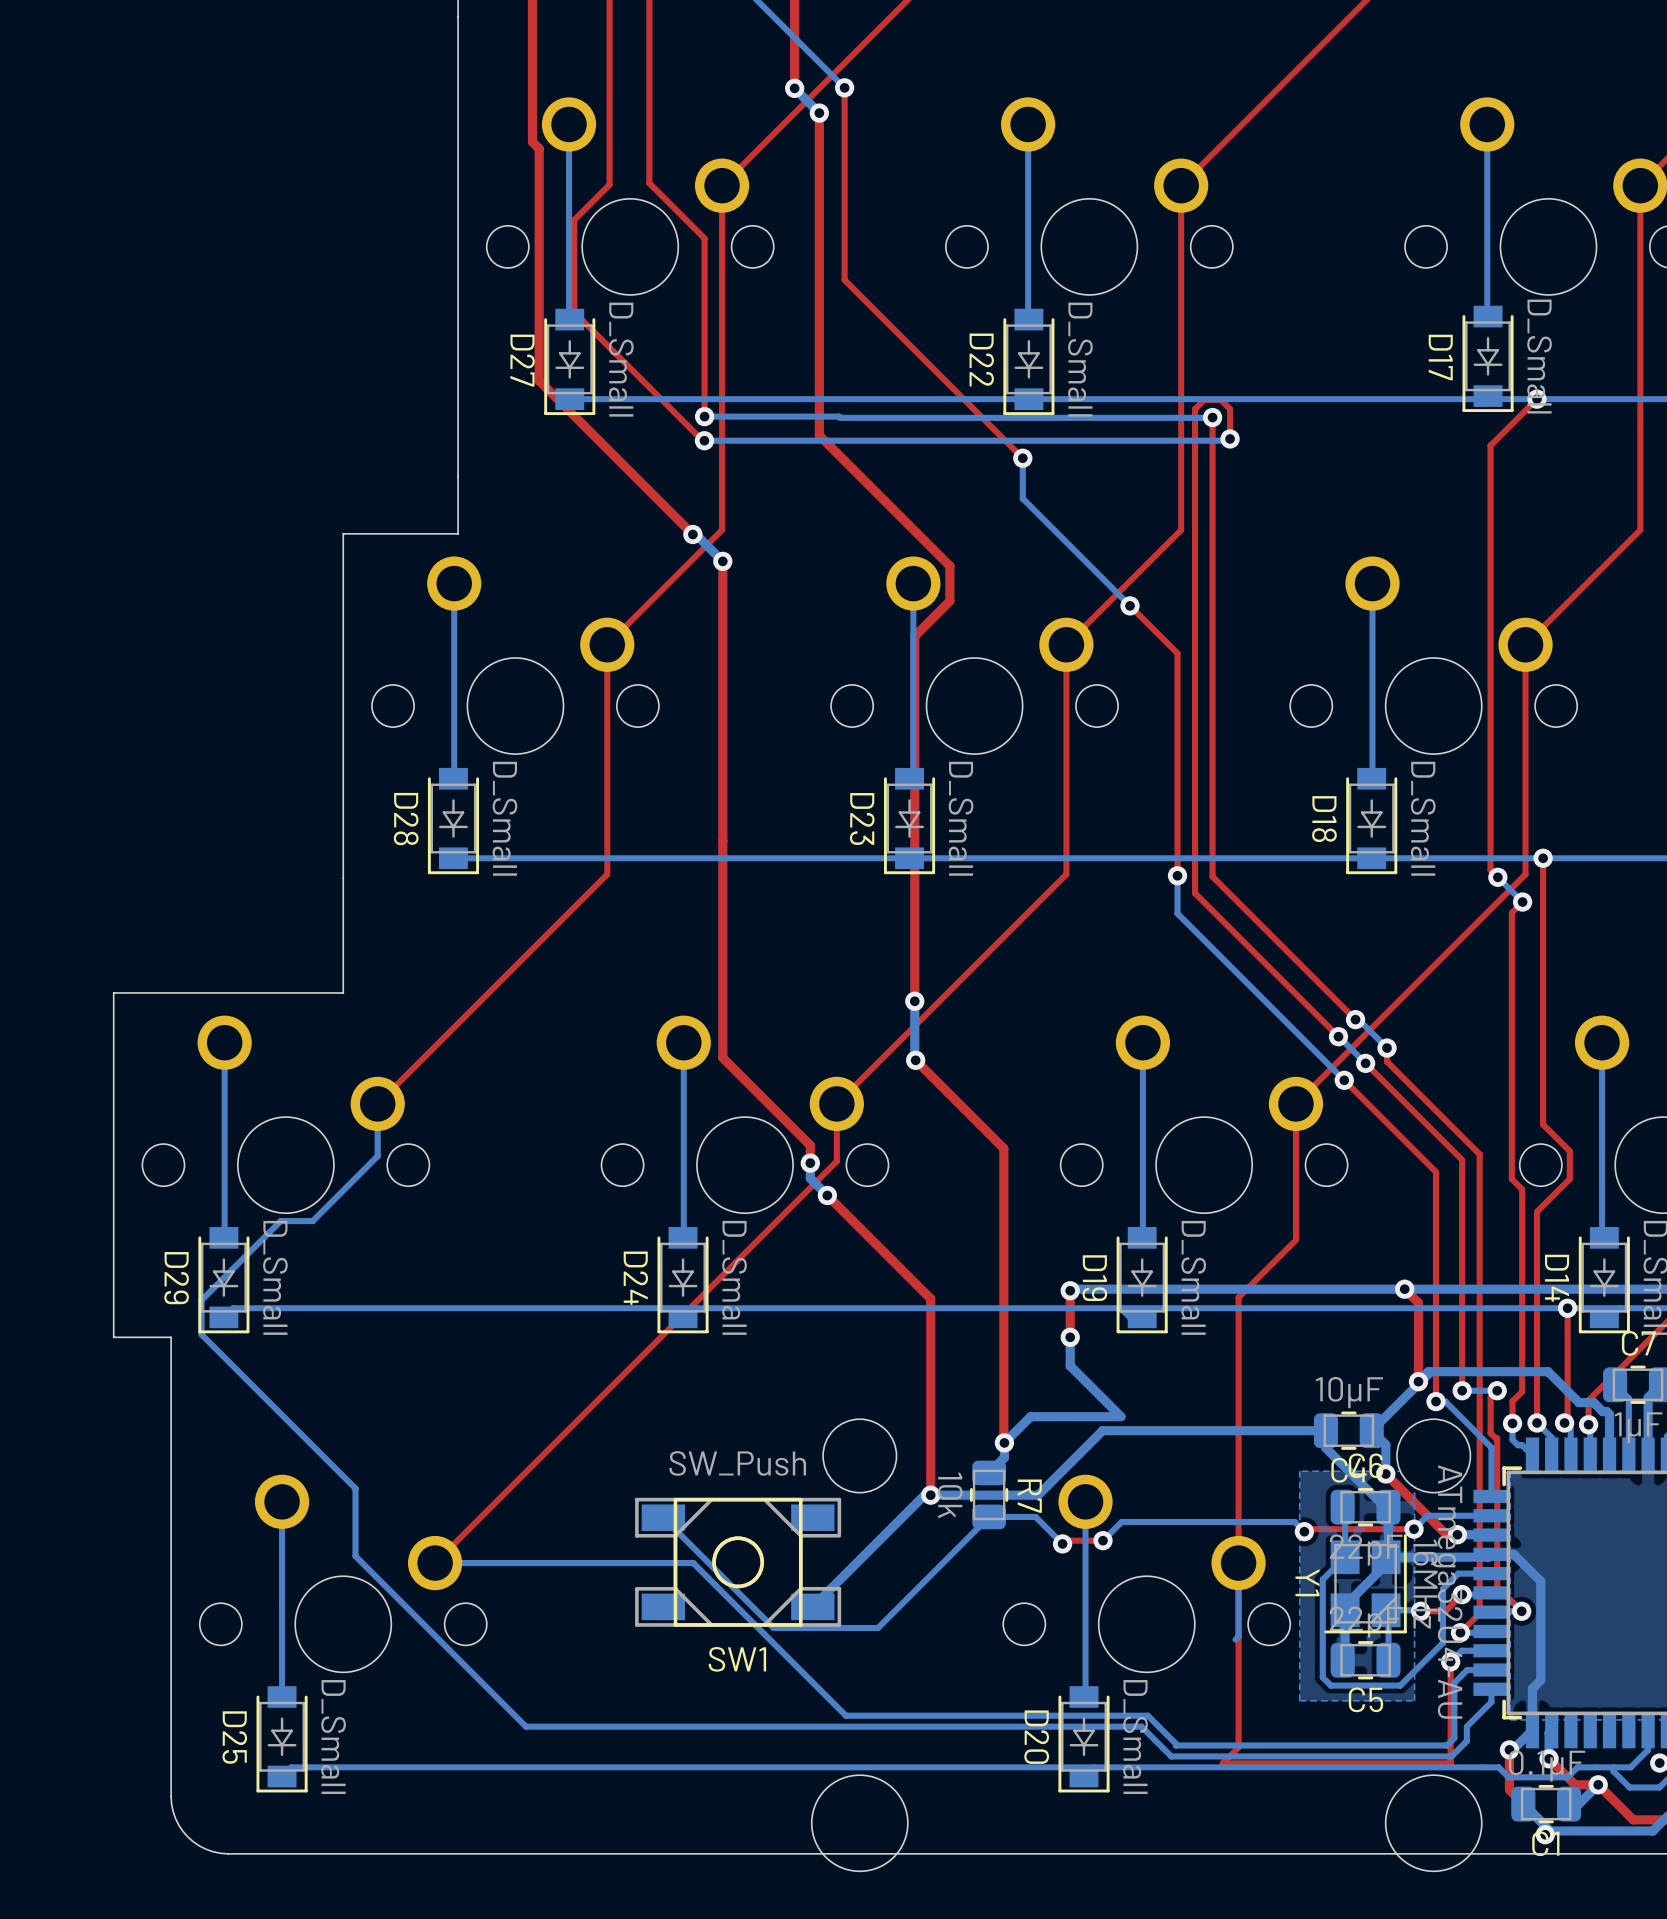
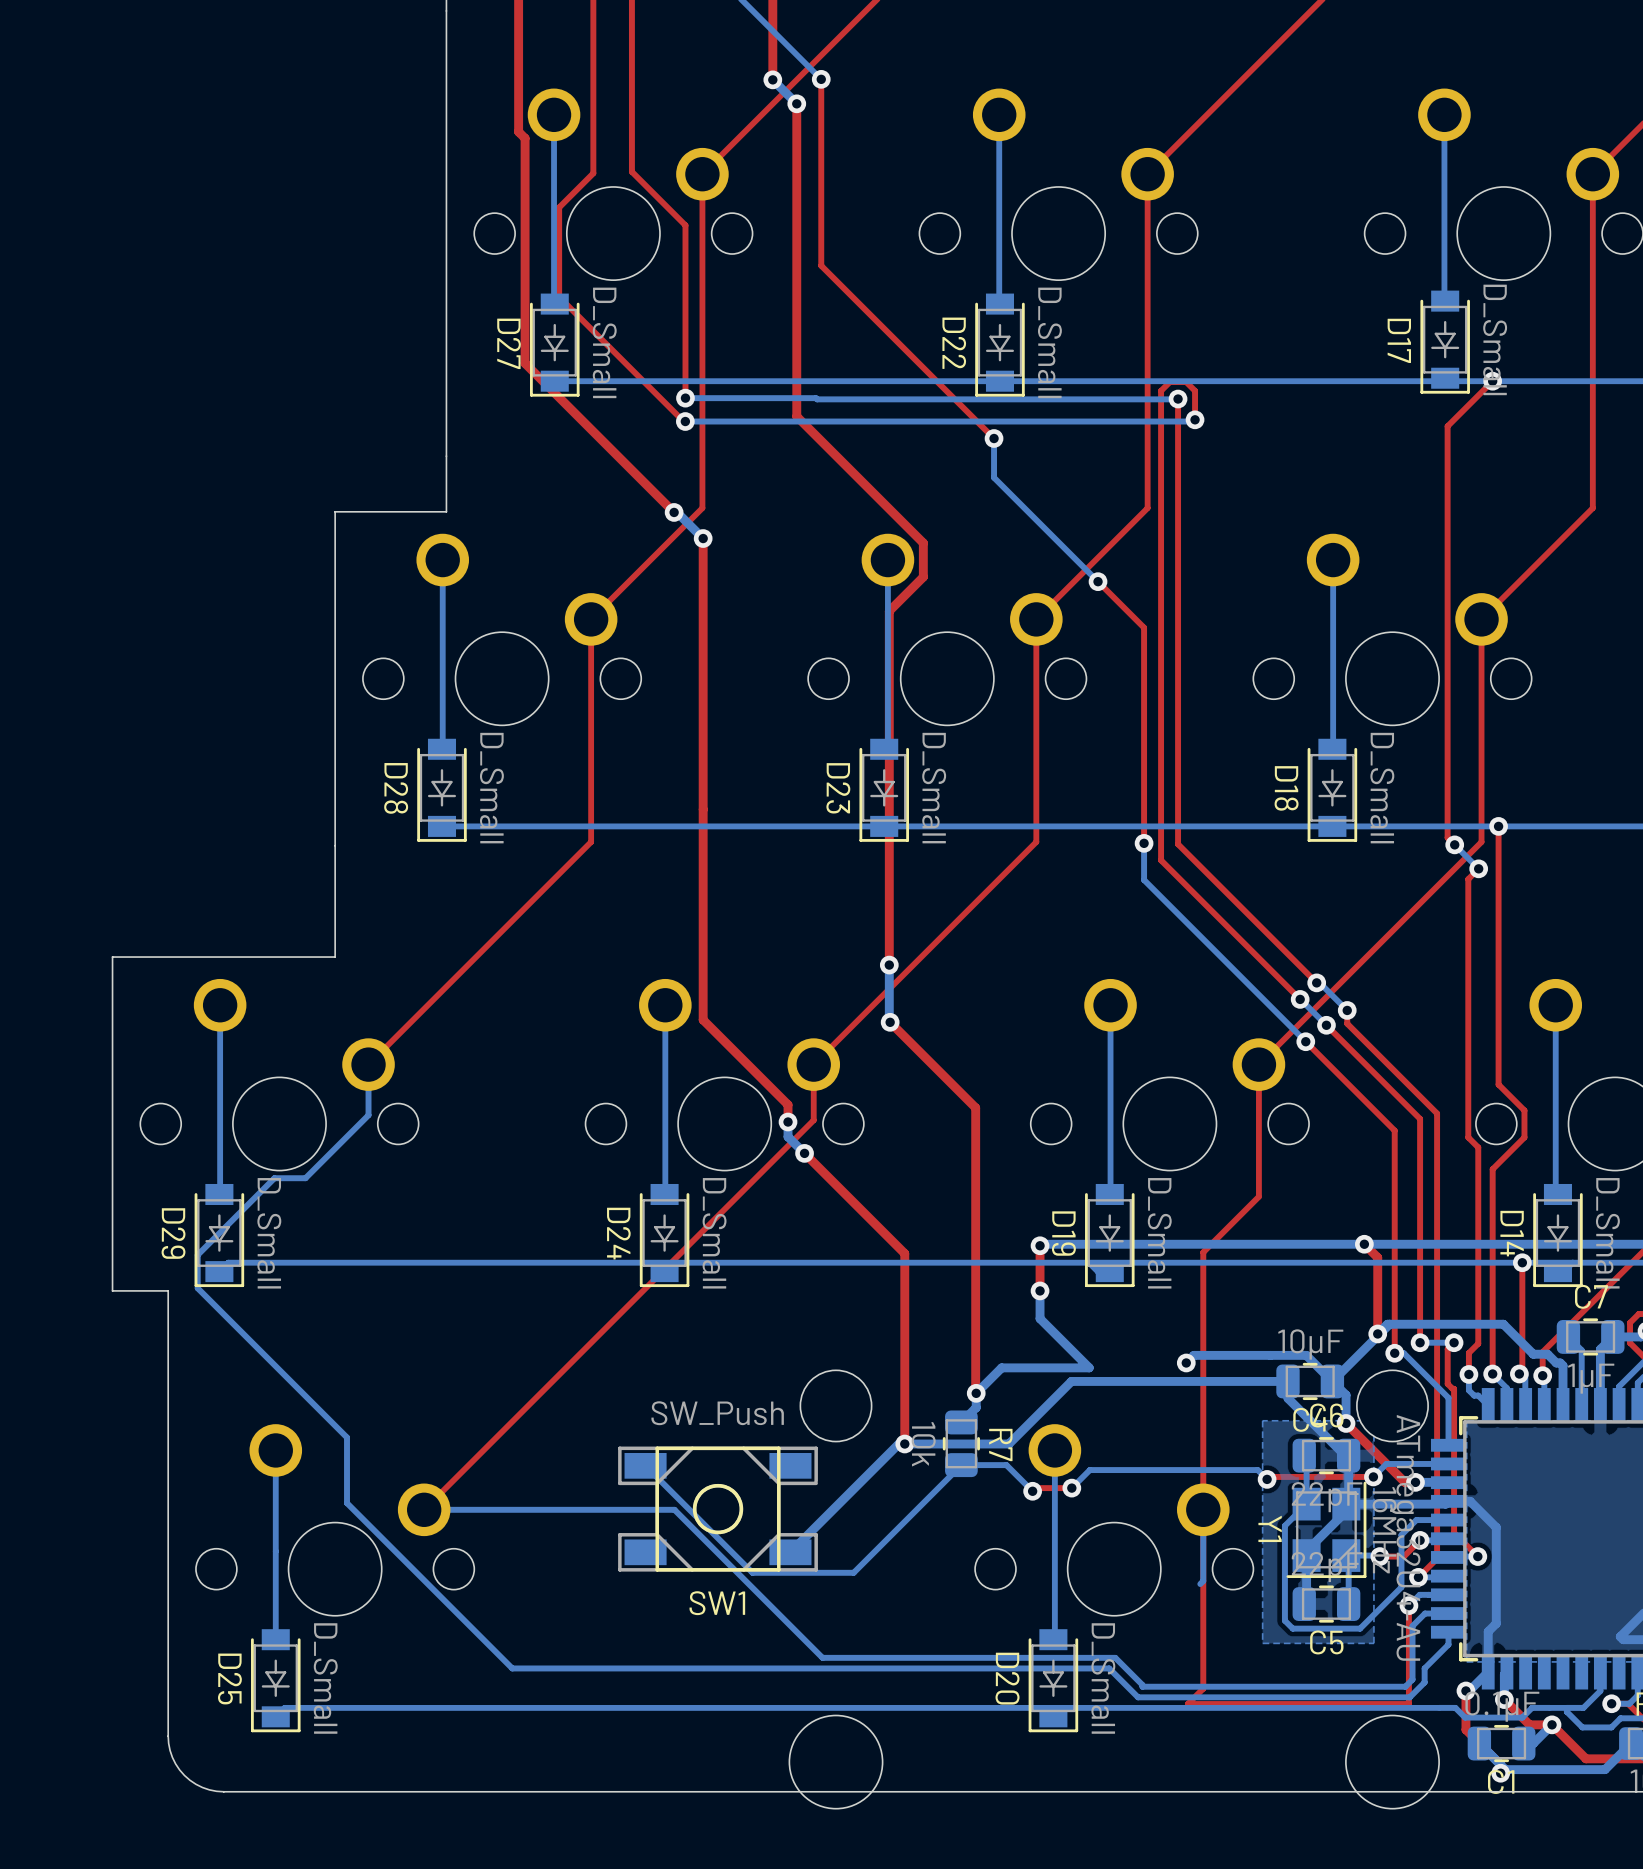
bottom track: none -> (1186, 1362) (1193, 1355) (1306, 1355) (1332, 1381)
via: none -> (1186, 1362)

